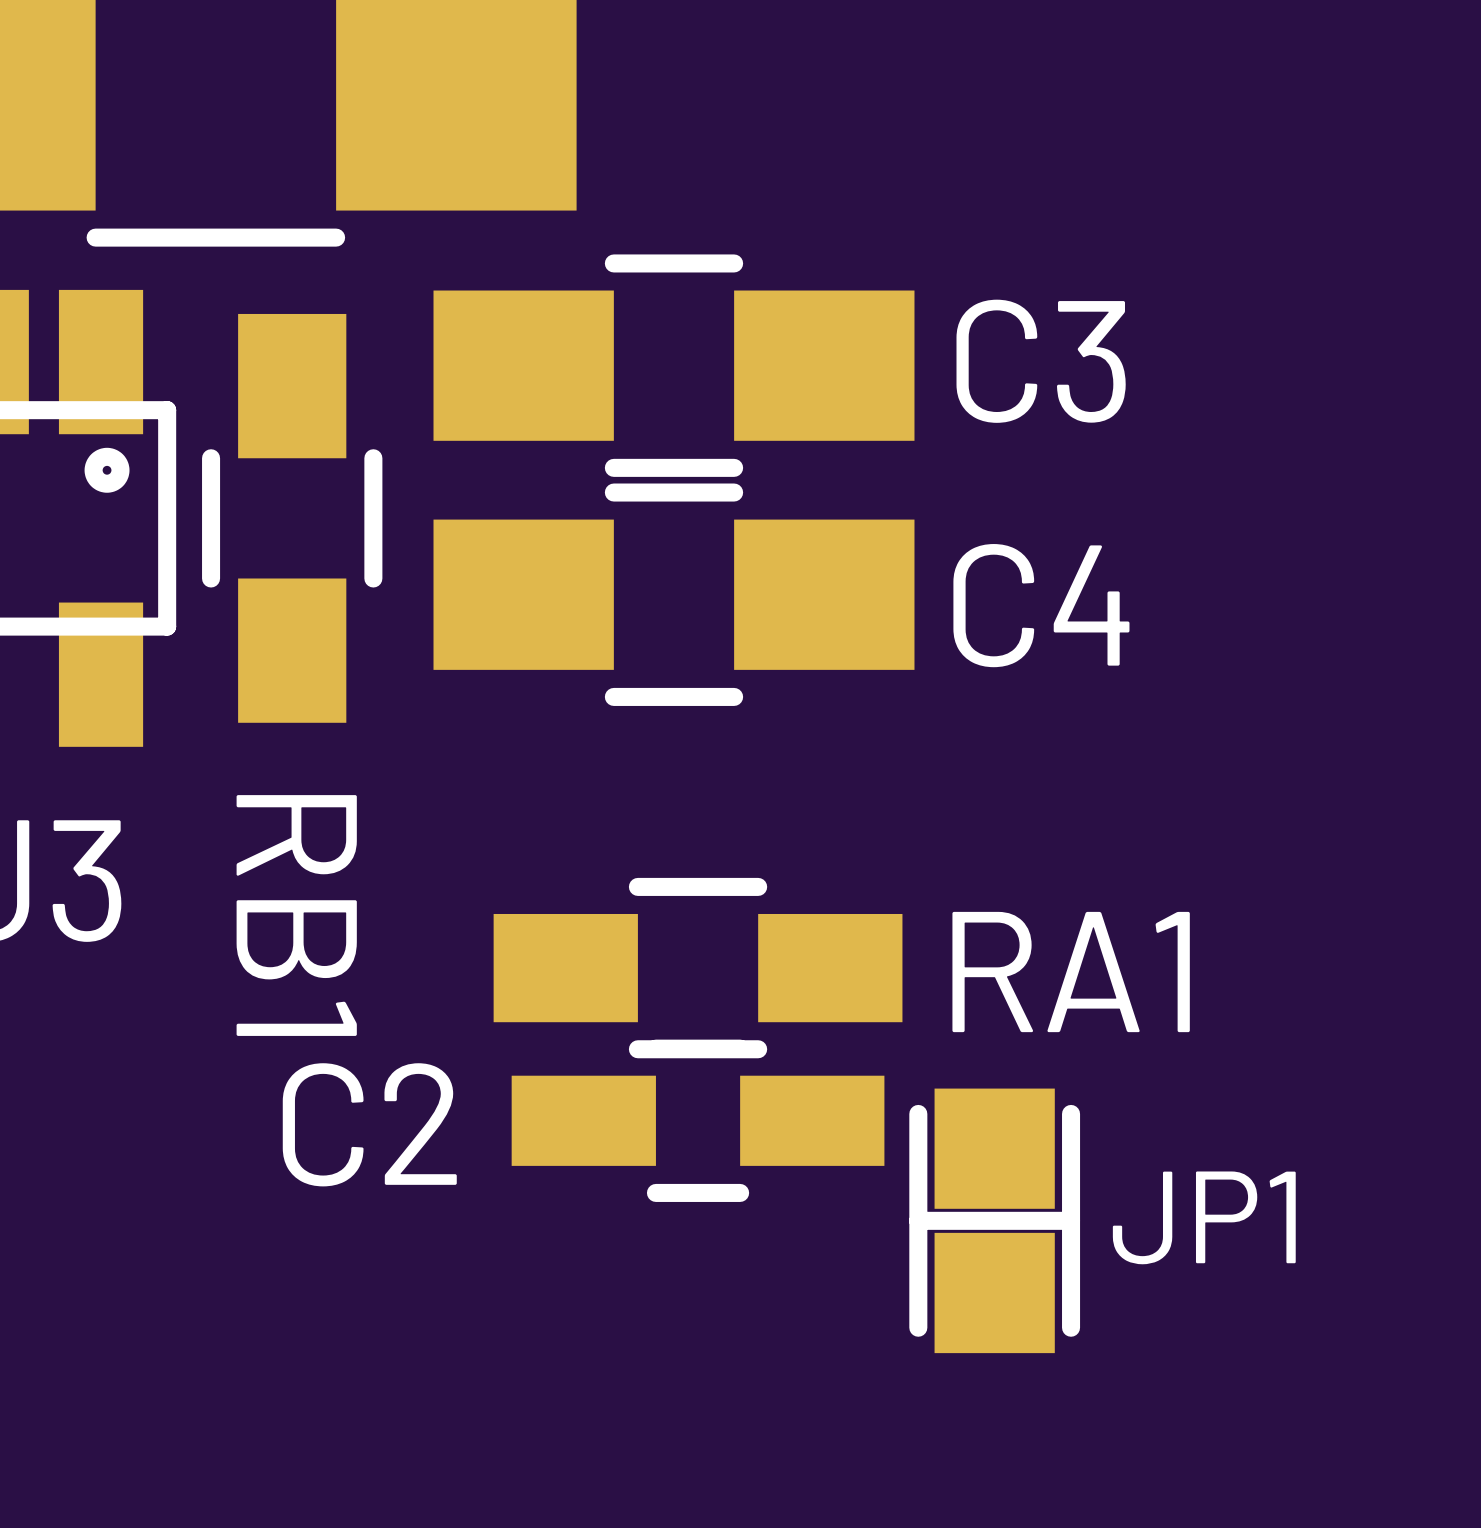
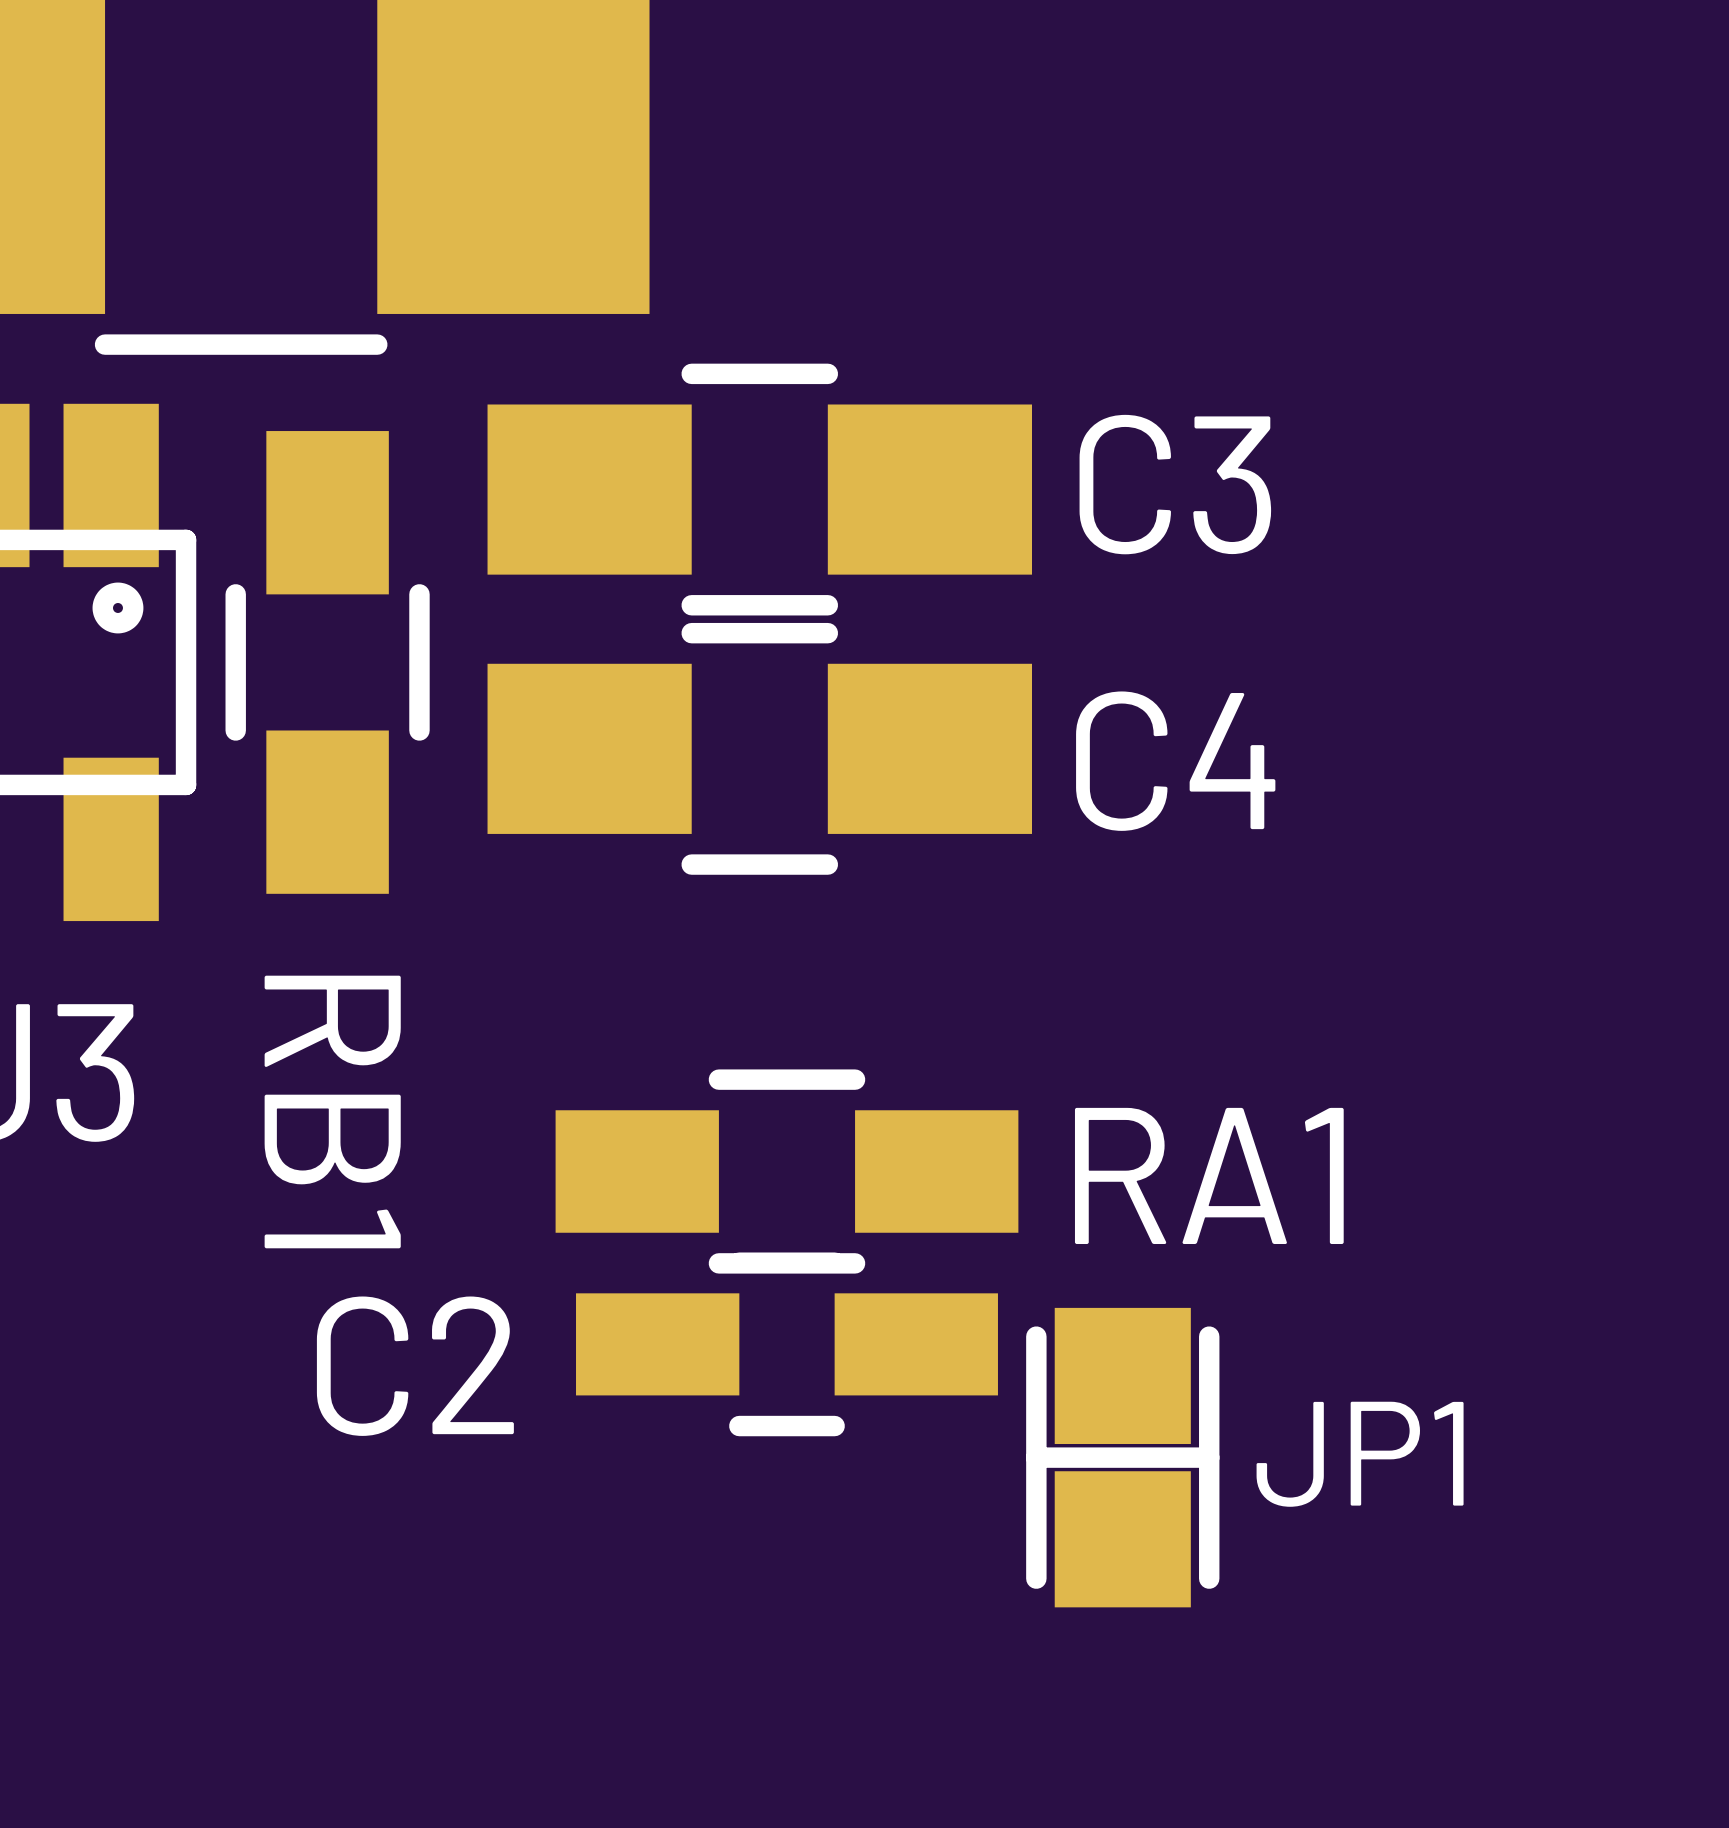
C2 name position: C2 (369, 1124) -> C2 (415, 1366)

